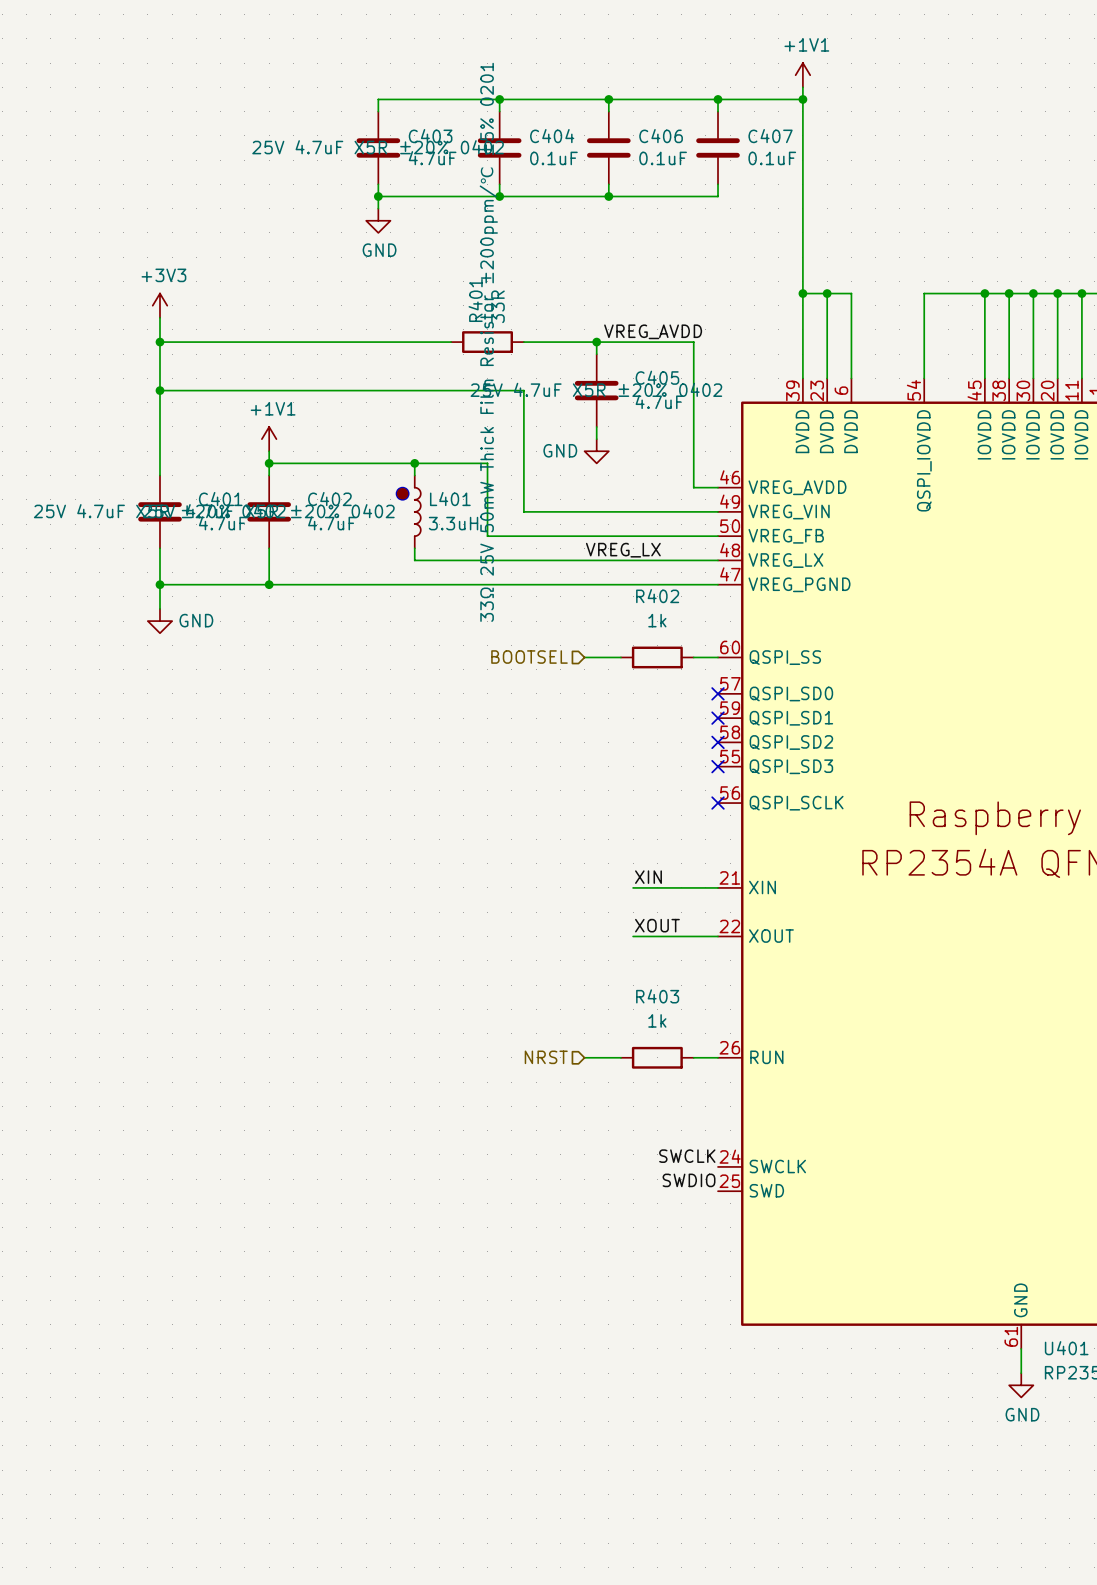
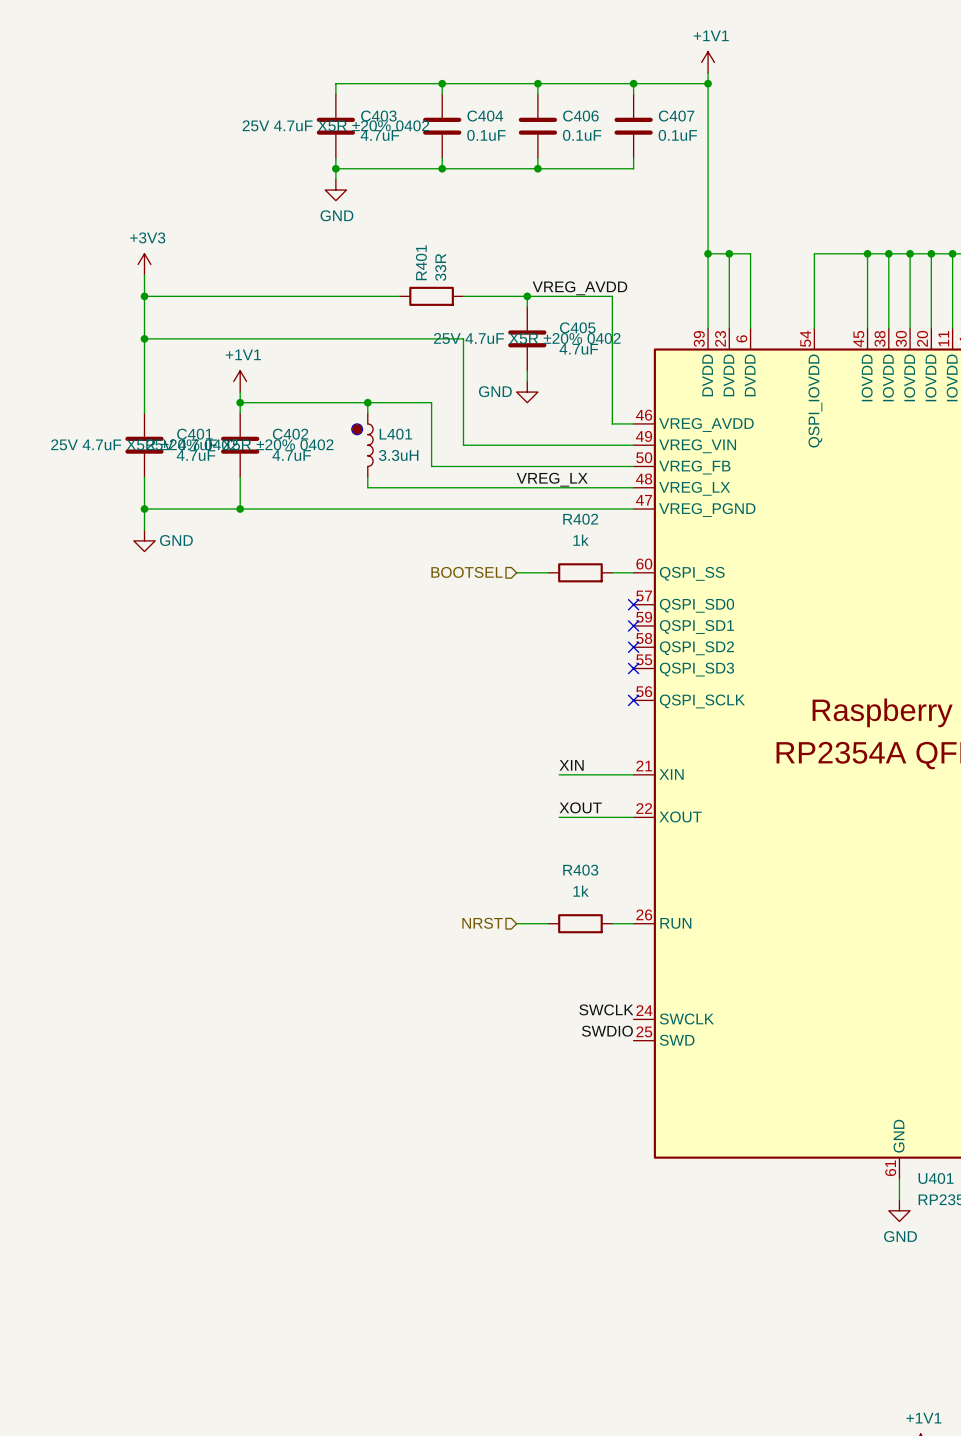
R401 text: 33Ω 25V 50mW Thick Film Resistor ±200ppm/℃ ±5% 0201 (488, 342) -> none

